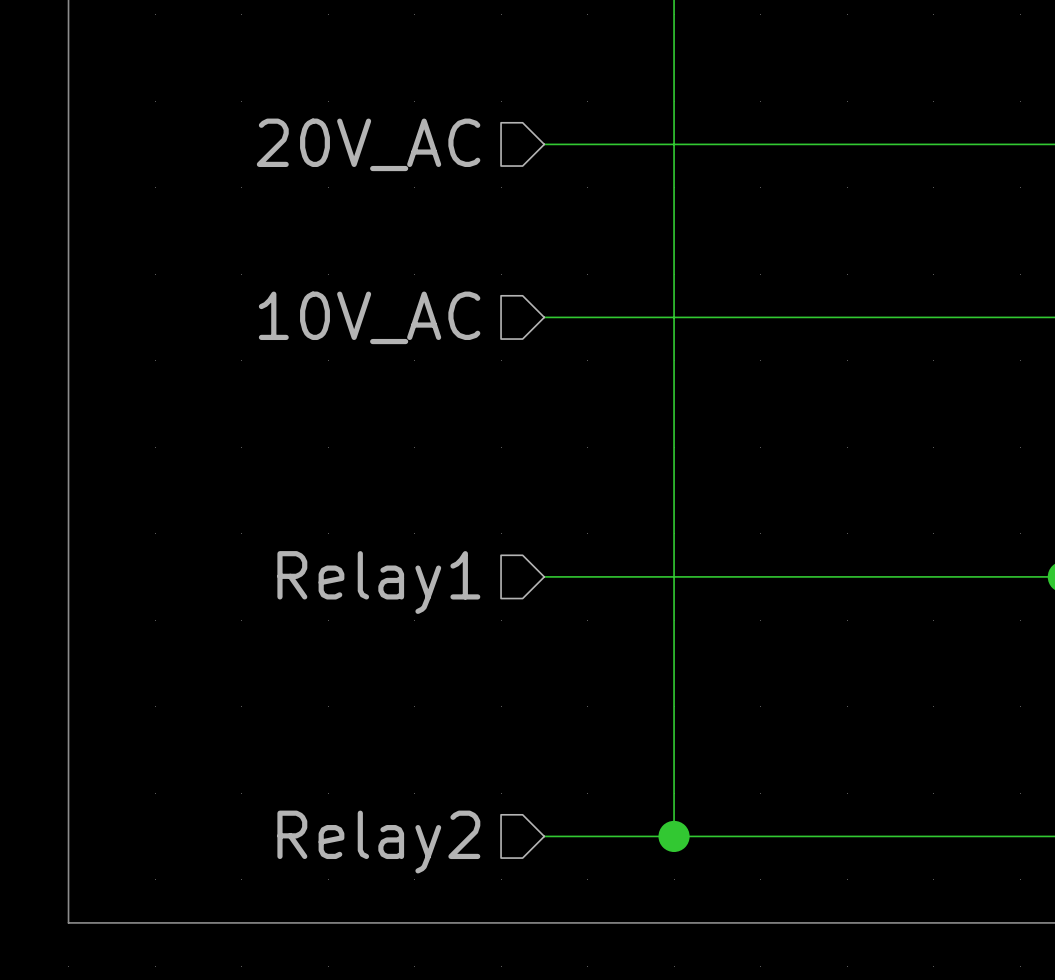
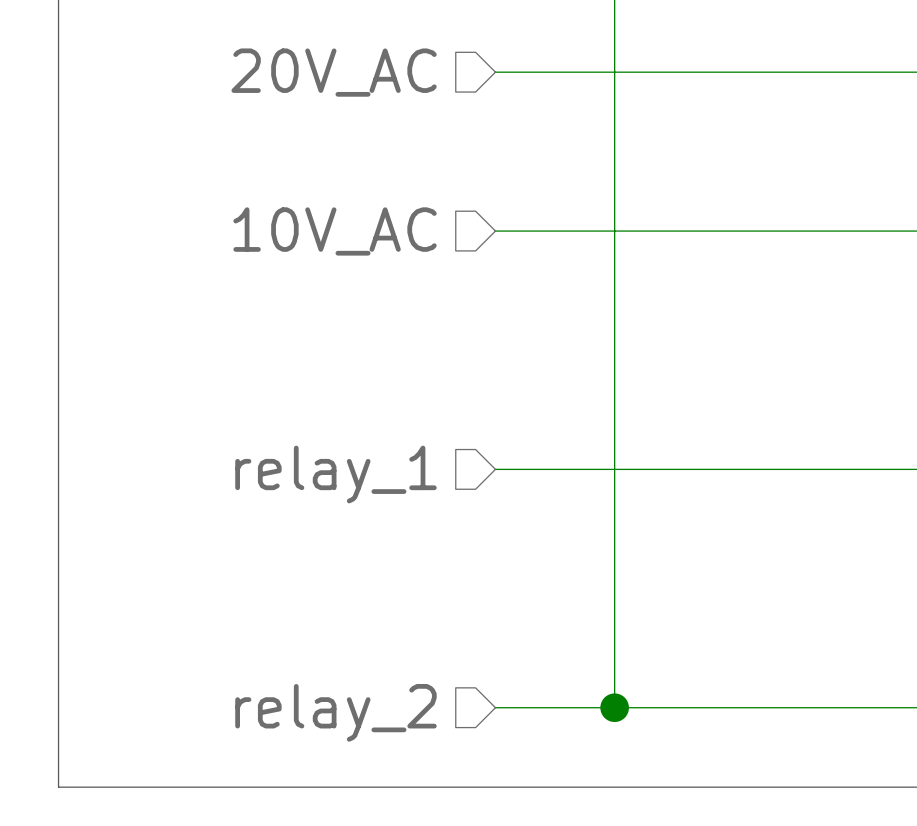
hierarchical label: Relay1 (378, 582) -> relay_1 (335, 474)
hierarchical label: Relay2 (378, 842) -> relay_2 (335, 712)

